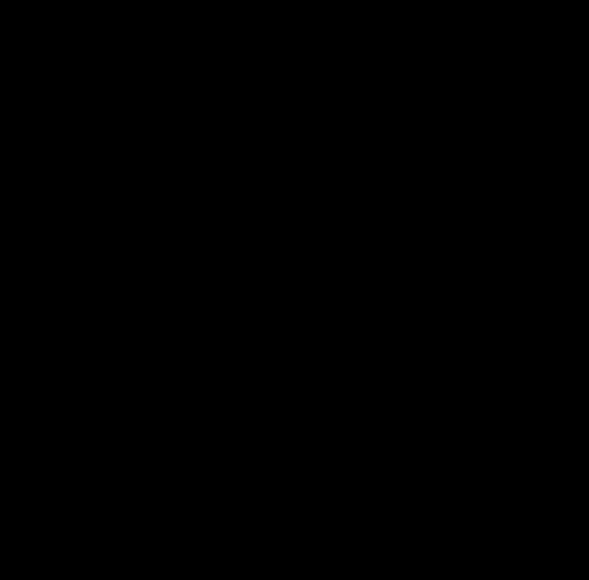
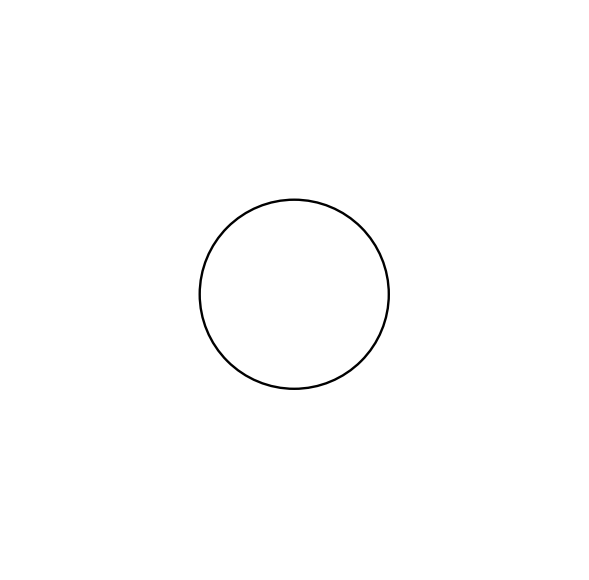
round board edge: none -> [198, 198, 390, 390]

